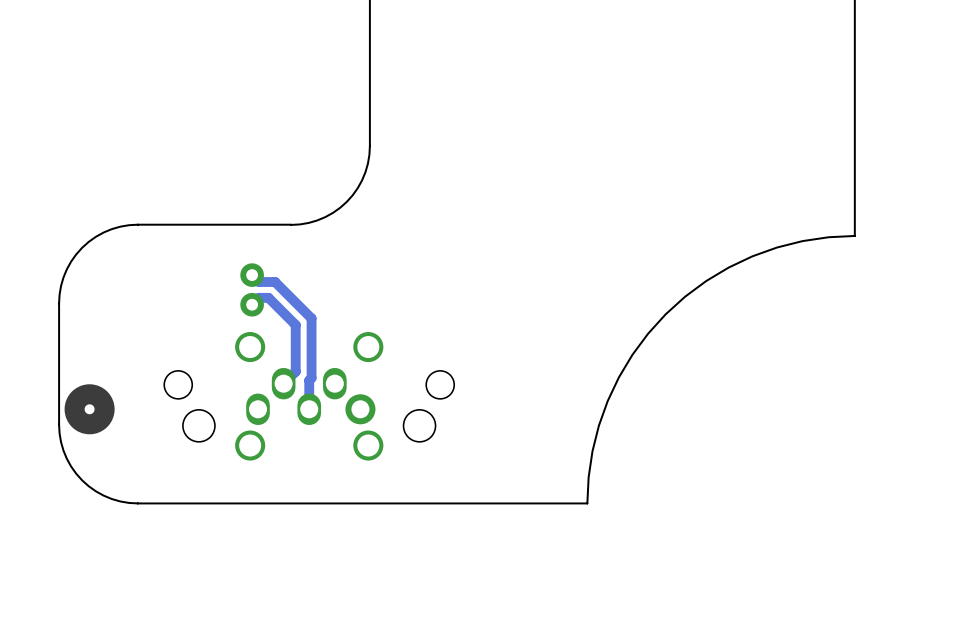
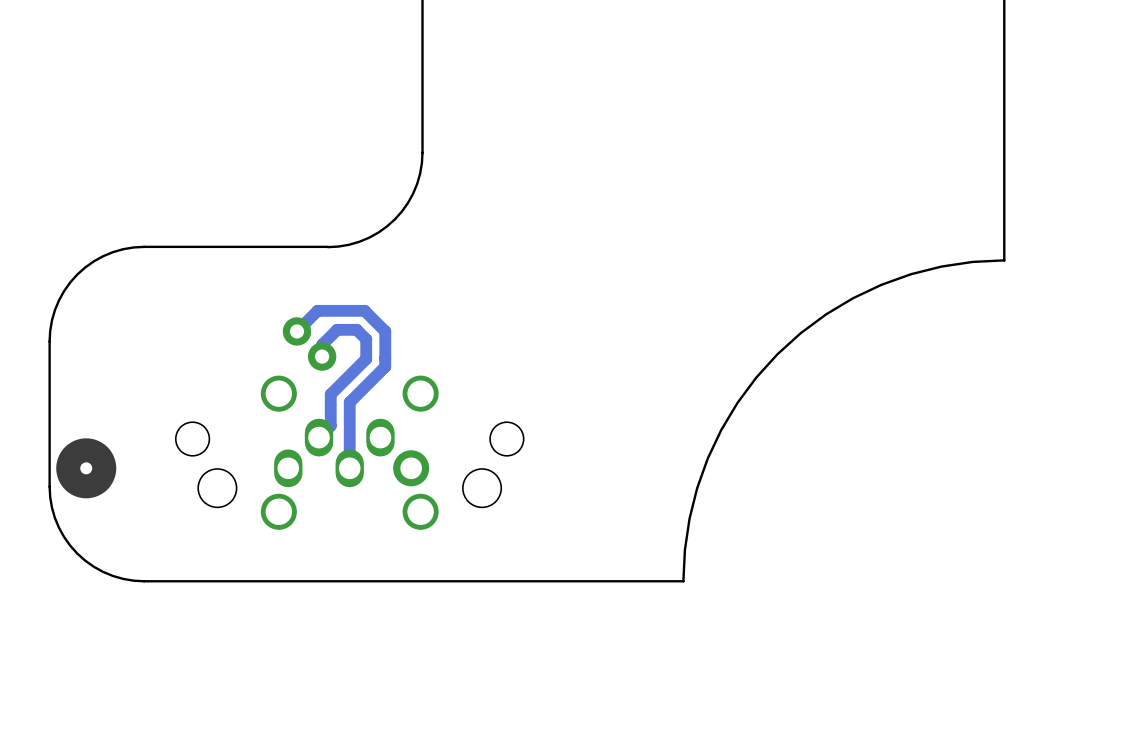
track: (252, 275) (259, 282) (275, 282) (311, 318) (311, 378) (309, 380) -> (296, 331) (317, 310) (364, 310) (385, 331) (385, 366) (349, 402) (349, 433)
via: (252, 275) -> none
via: none -> (296, 331)
track: (252, 304) (259, 297) (268, 297) (295, 325) (295, 371) (293, 373) -> (322, 356) (322, 344) (337, 329) (356, 329) (366, 339) (366, 358) (330, 394) (330, 425)
via: (252, 304) -> none
via: none -> (322, 356)

